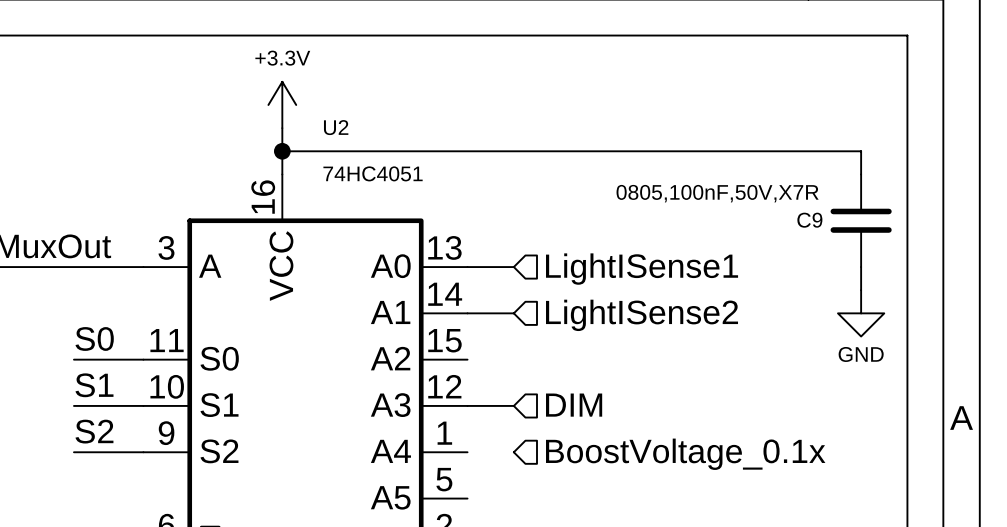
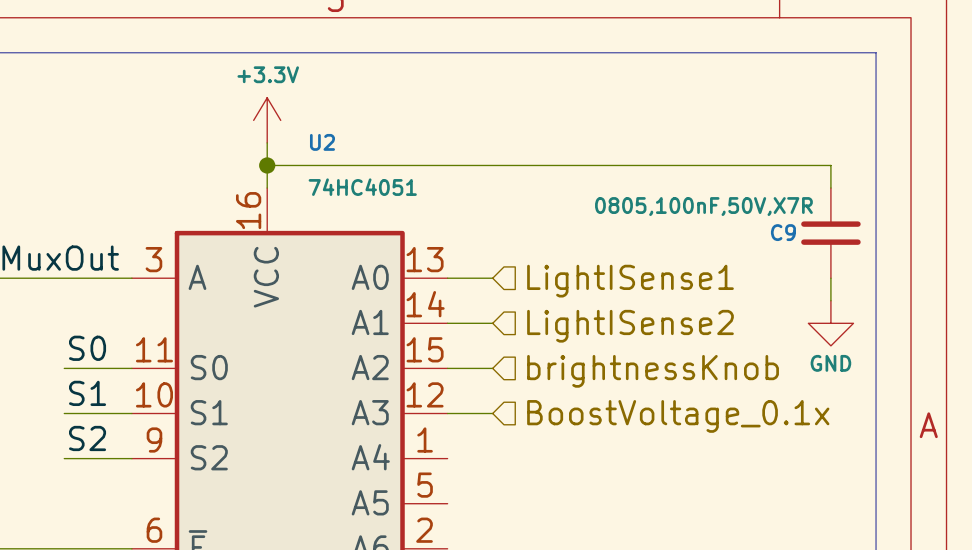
wire: none -> (447, 368) (492, 368)
hierarchical label: none -> brightnessKnob (653, 371)
hierarchical label: DIM (574, 405) -> BoostVoltage_0.1x (678, 416)
hierarchical label: BoostVoltage_0.1x (685, 454) -> none

